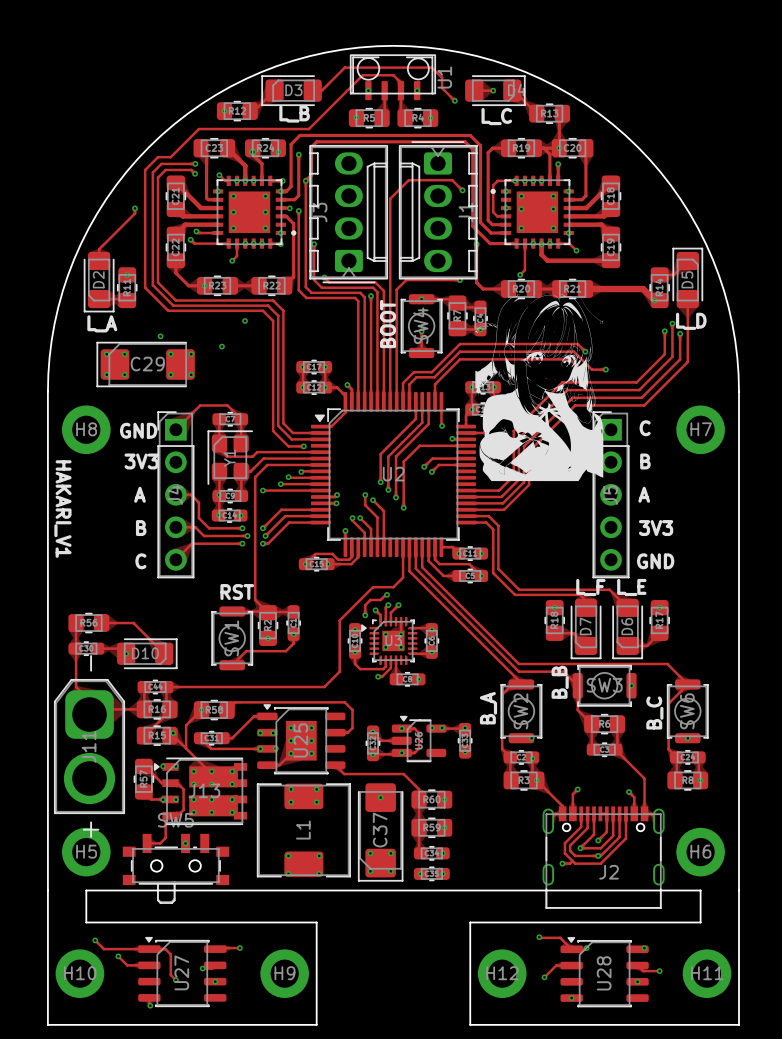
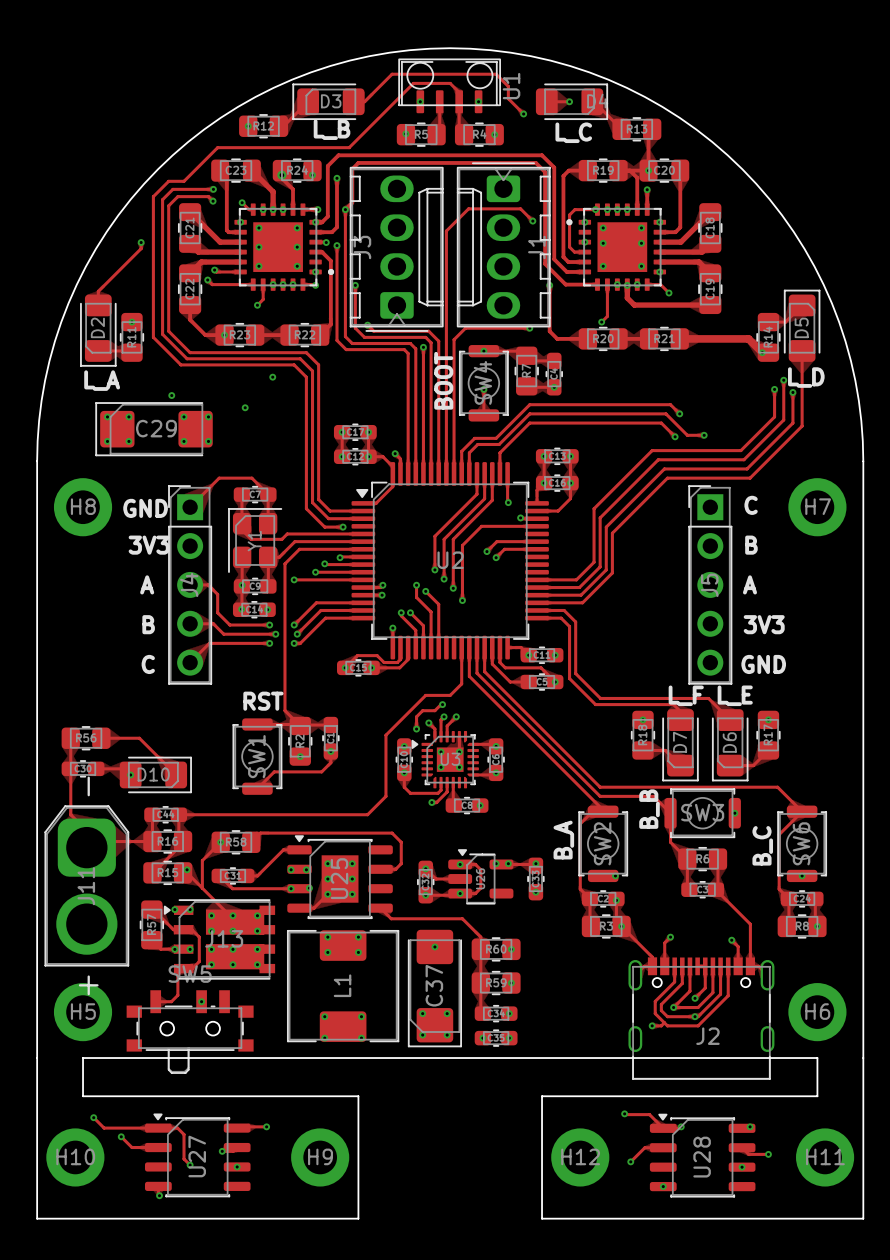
drawing: [475, 294, 604, 482] -> none
text: HAKARI_V1 (62, 509) -> none

